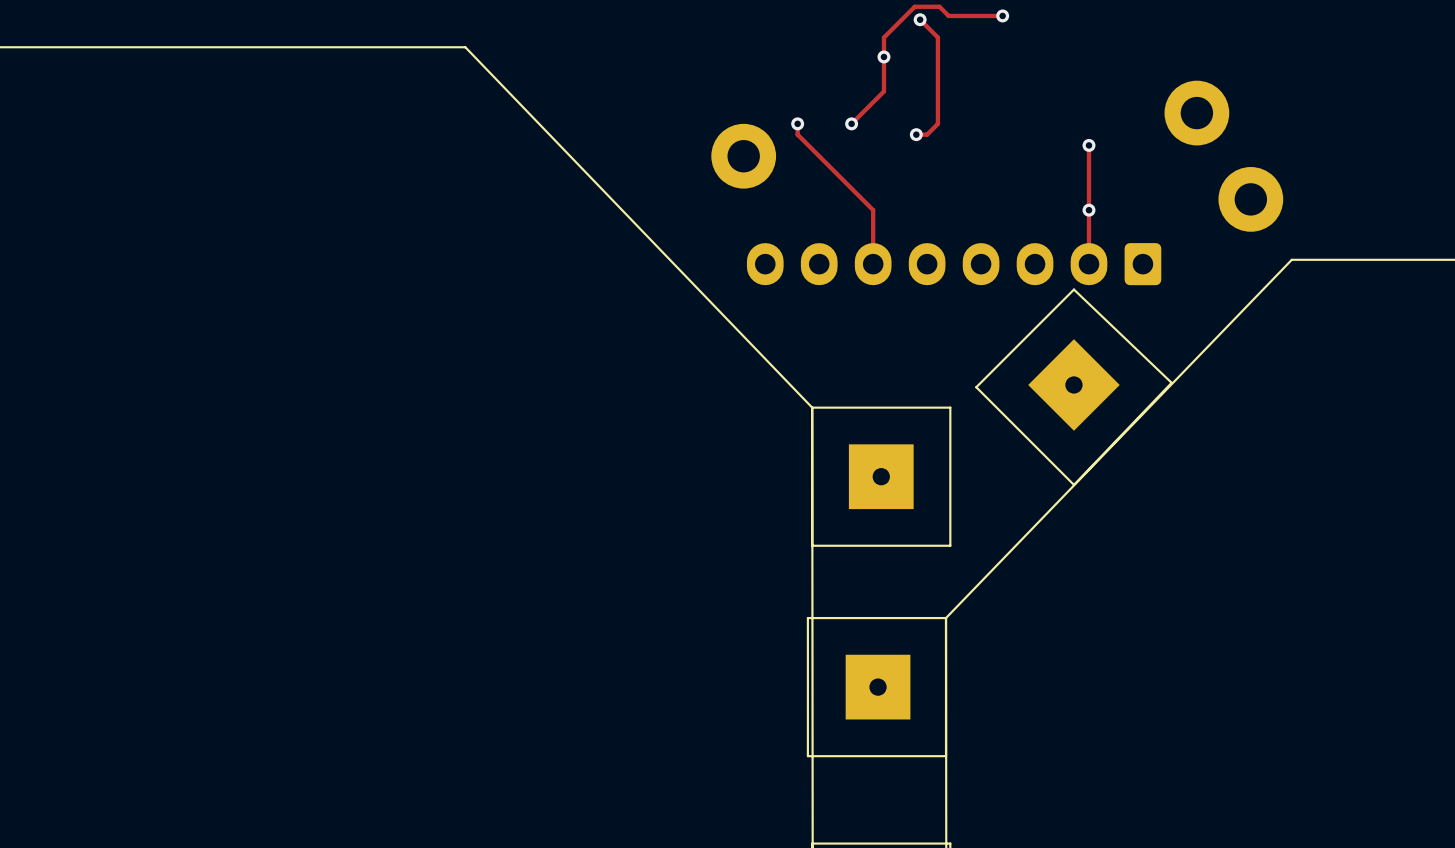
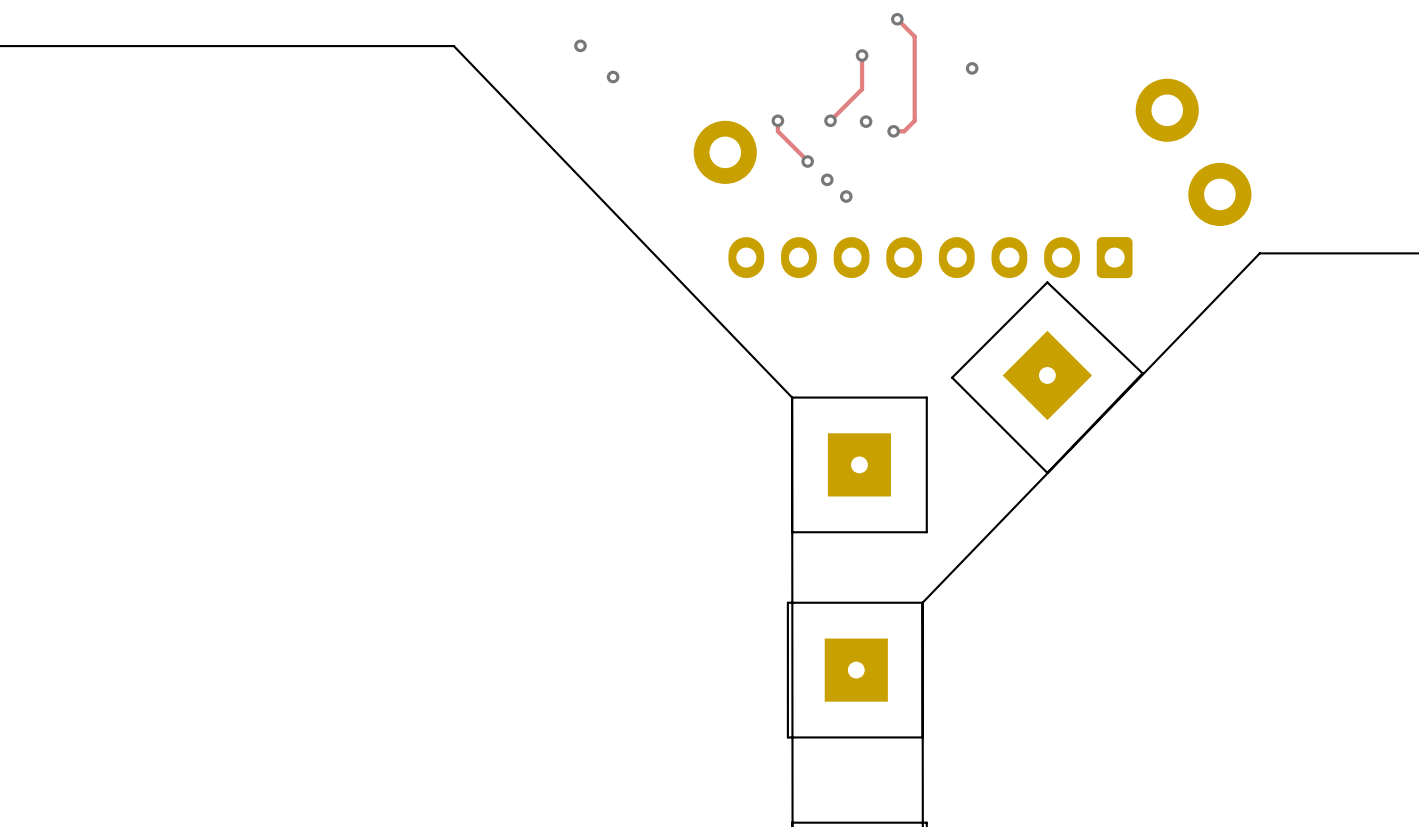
track: (1002, 15) (948, 15) (939, 6) (914, 6) (883, 37) (883, 56) -> none
via position: (1002, 15) -> (972, 68)
via: none -> (580, 45)
via: none -> (613, 77)
via: none -> (866, 121)
track: (1088, 145) (1088, 264) -> none
via: (1088, 145) -> none
track: (828, 165) (873, 210) (873, 264) -> none
via: none -> (807, 161)
via: none -> (827, 179)
via: none -> (846, 196)
via: (1088, 210) -> none

